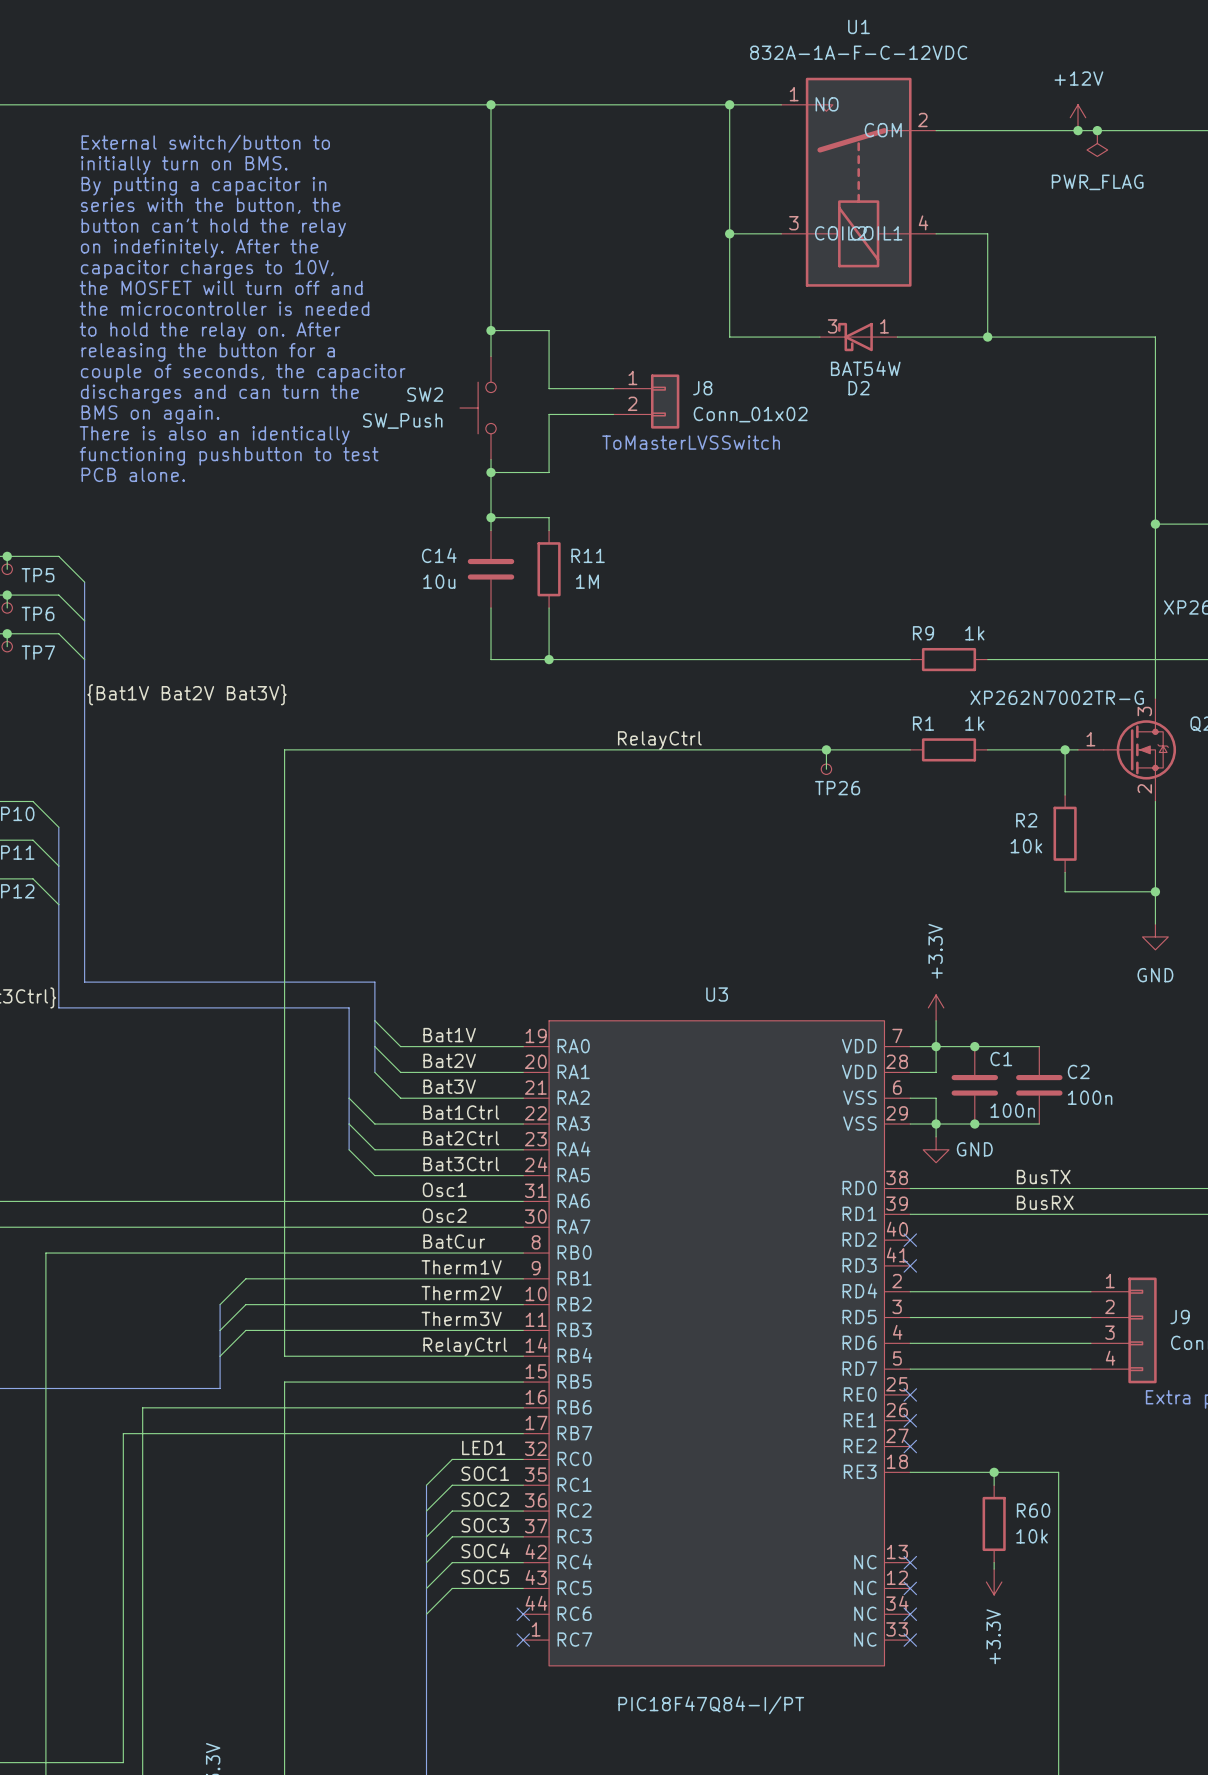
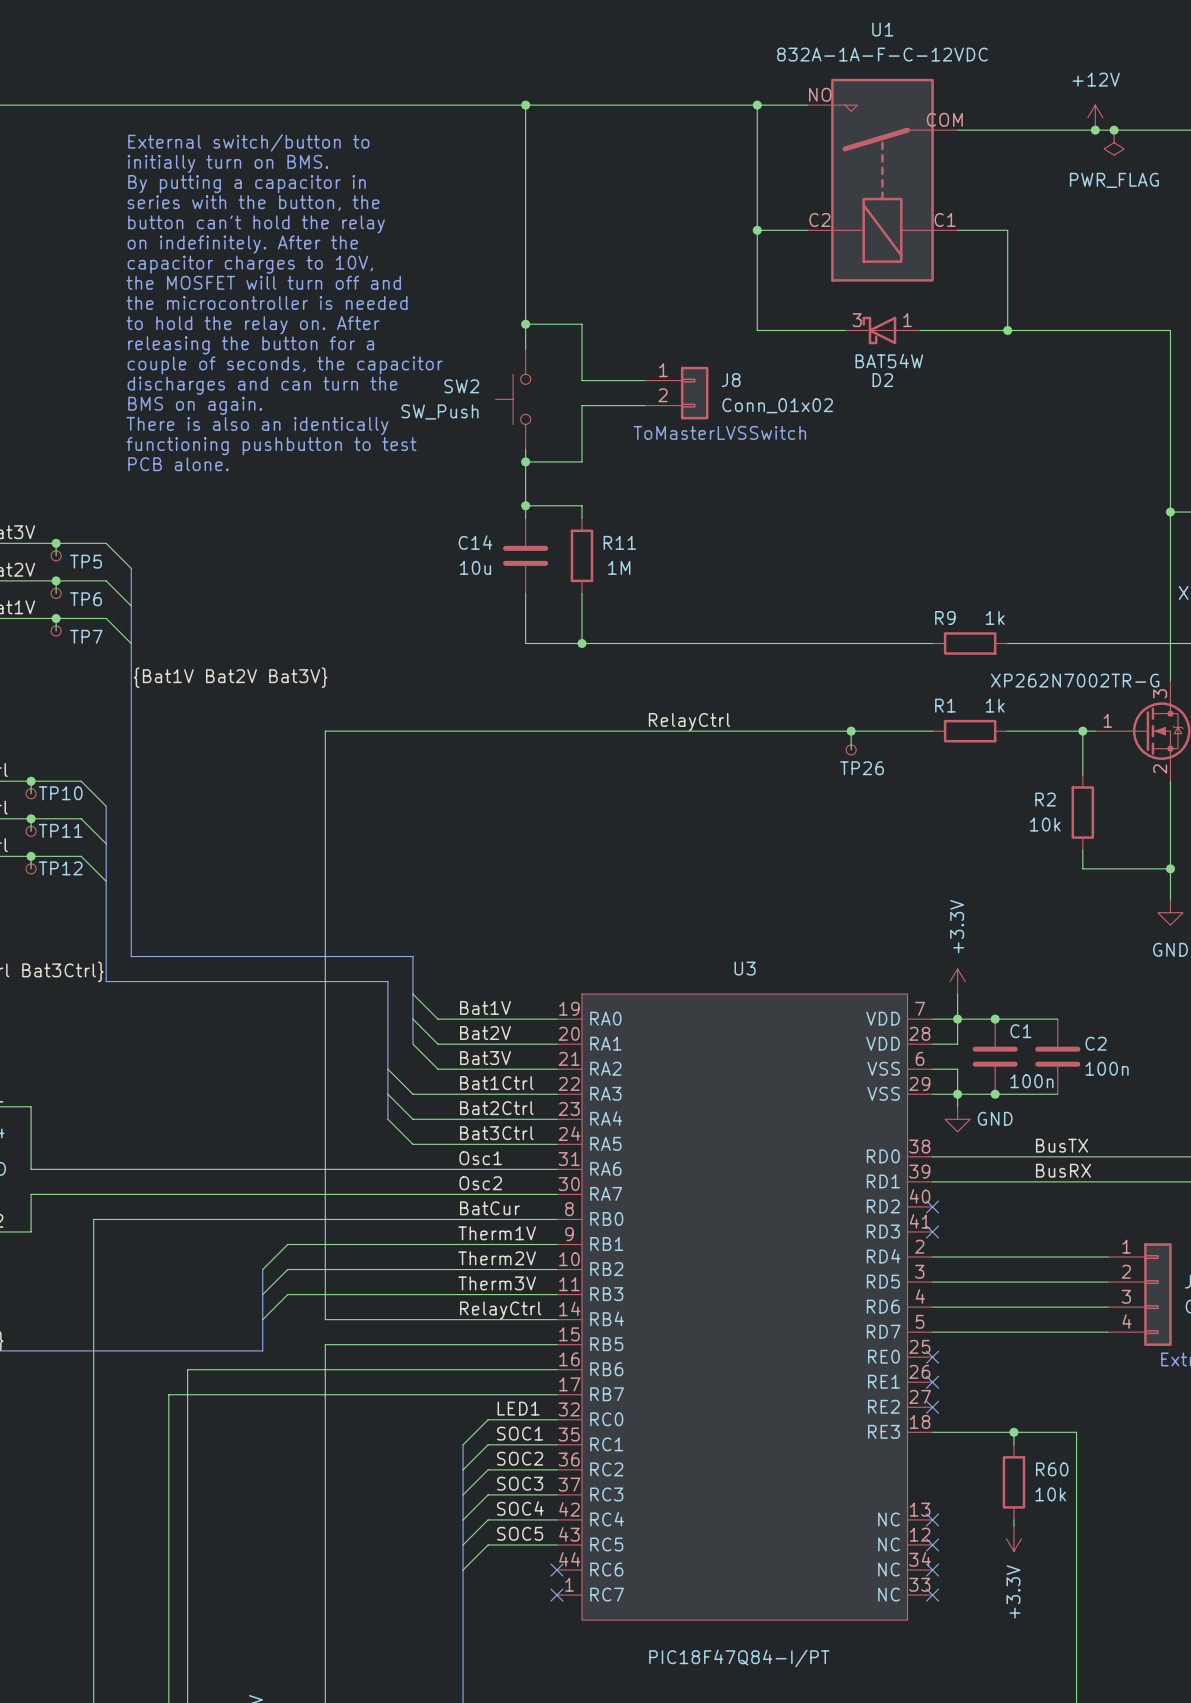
U1 pin number: 1 (794, 94) -> NO (820, 94)
U1 pin name: NO (827, 104) -> none
U1 pin number: 2 (922, 119) -> COM (944, 119)
U1 pin name: COM (883, 130) -> none
U1 pin number: 4 (923, 222) -> C1 (945, 219)
U1 pin number: 3 (793, 223) -> C2 (819, 219)
U1 pin name: COIL2 (840, 233) -> none
U1 pin name: COIL1 (876, 233) -> none

